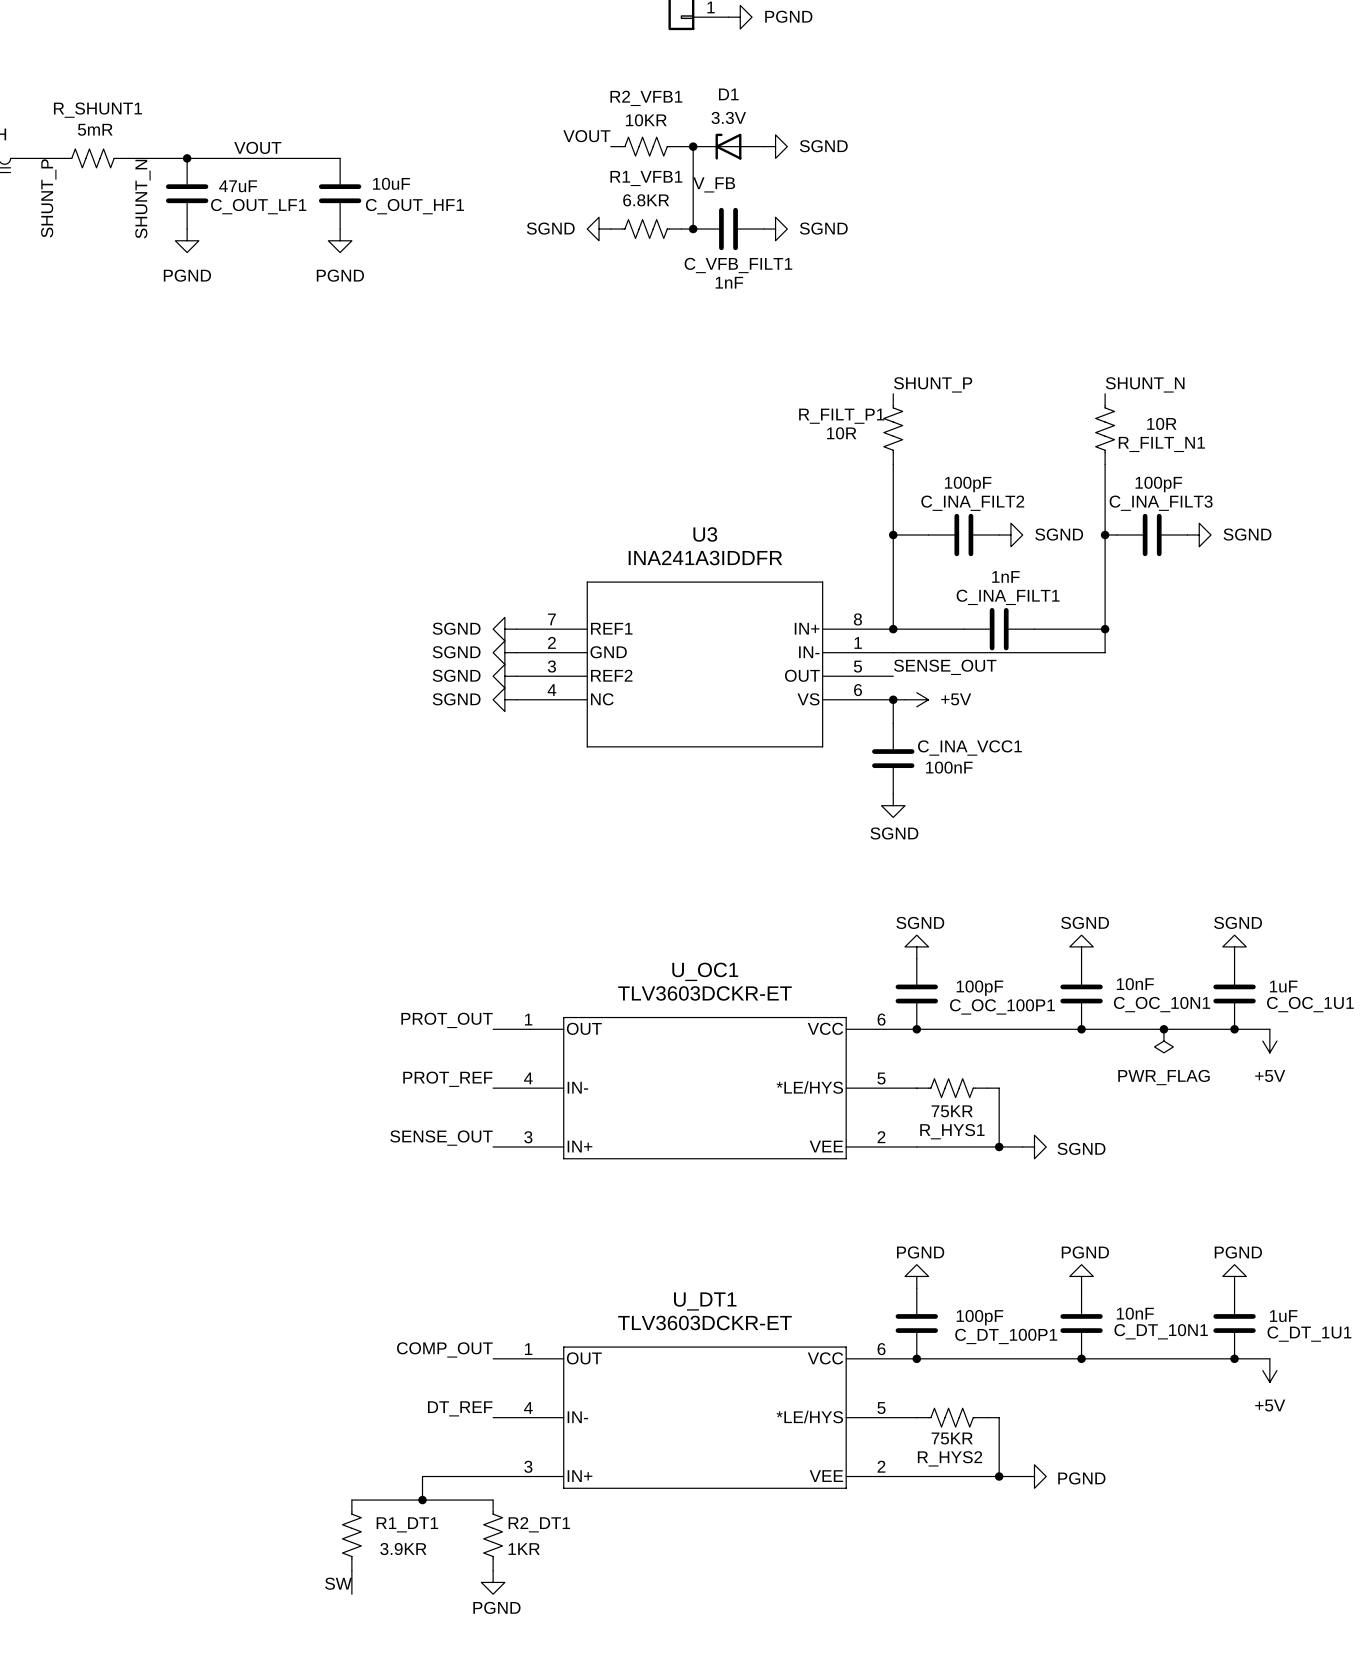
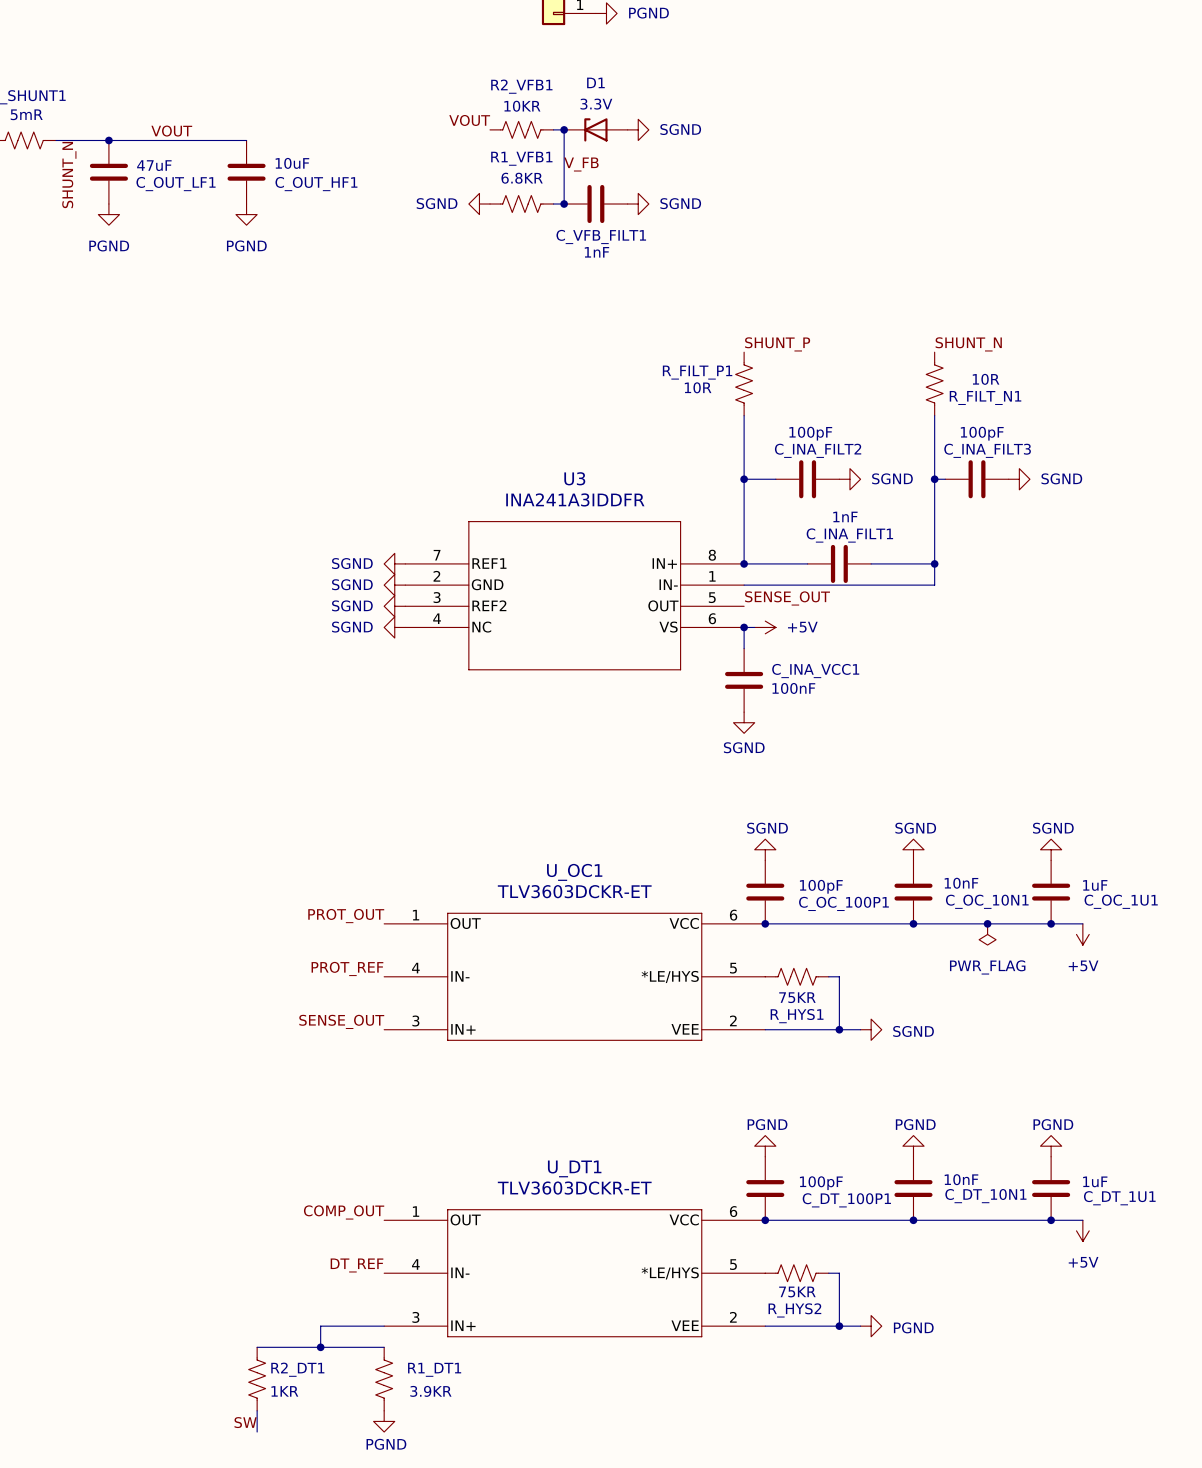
R1_DT1 name: R1_DT1 (407, 1524) -> R2_DT1 (297, 1369)
R2_DT1 name: R2_DT1 (539, 1524) -> R1_DT1 (434, 1369)
R1_DT1 value: 3.9KR (403, 1549) -> 1KR (284, 1391)
R2_DT1 value: 1KR (524, 1549) -> 3.9KR (430, 1391)

